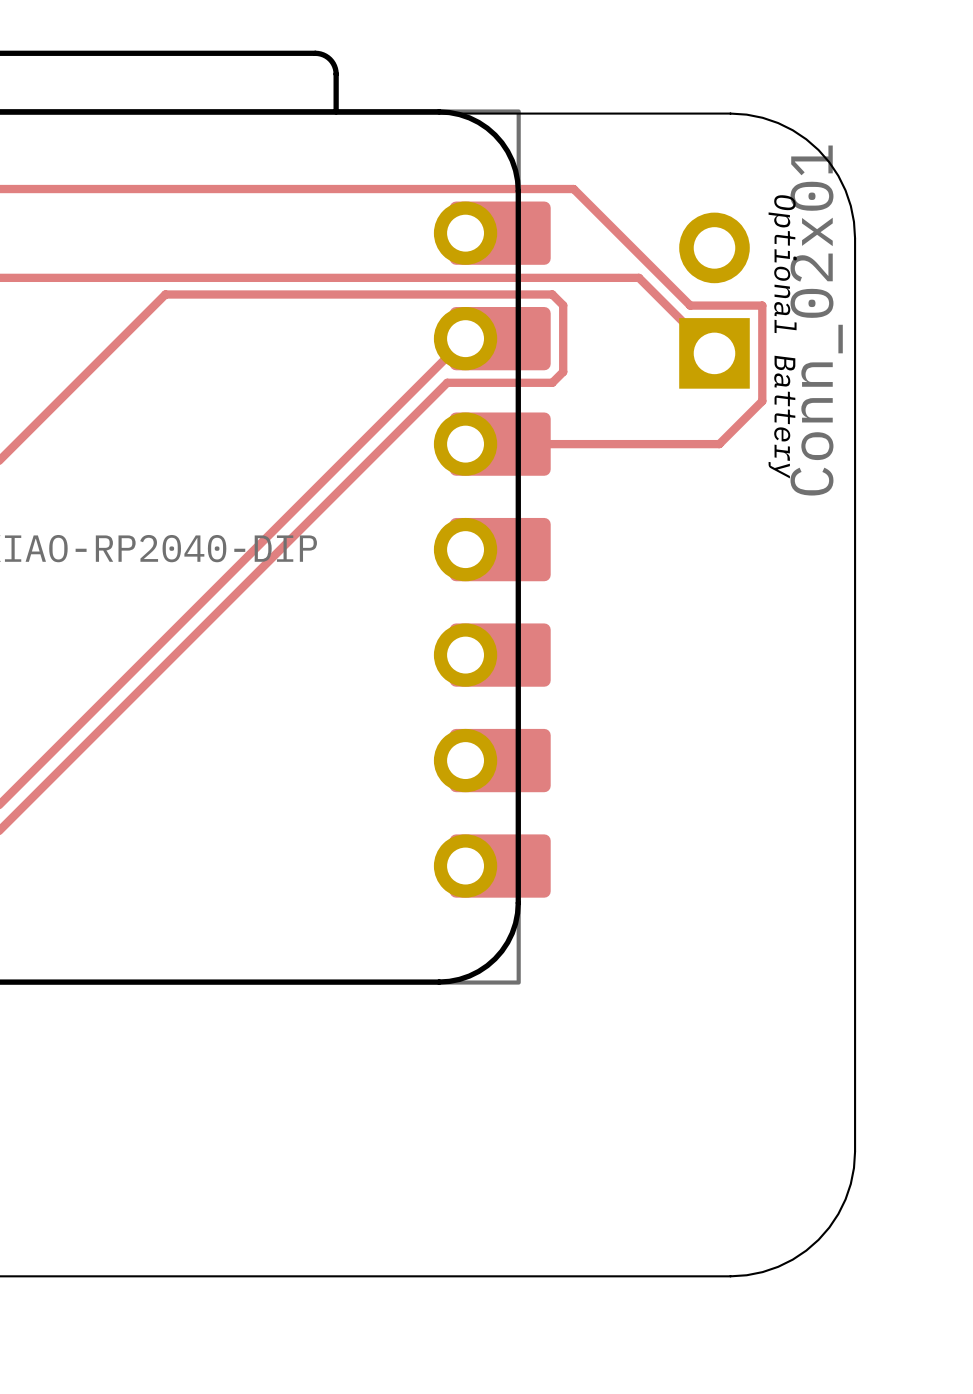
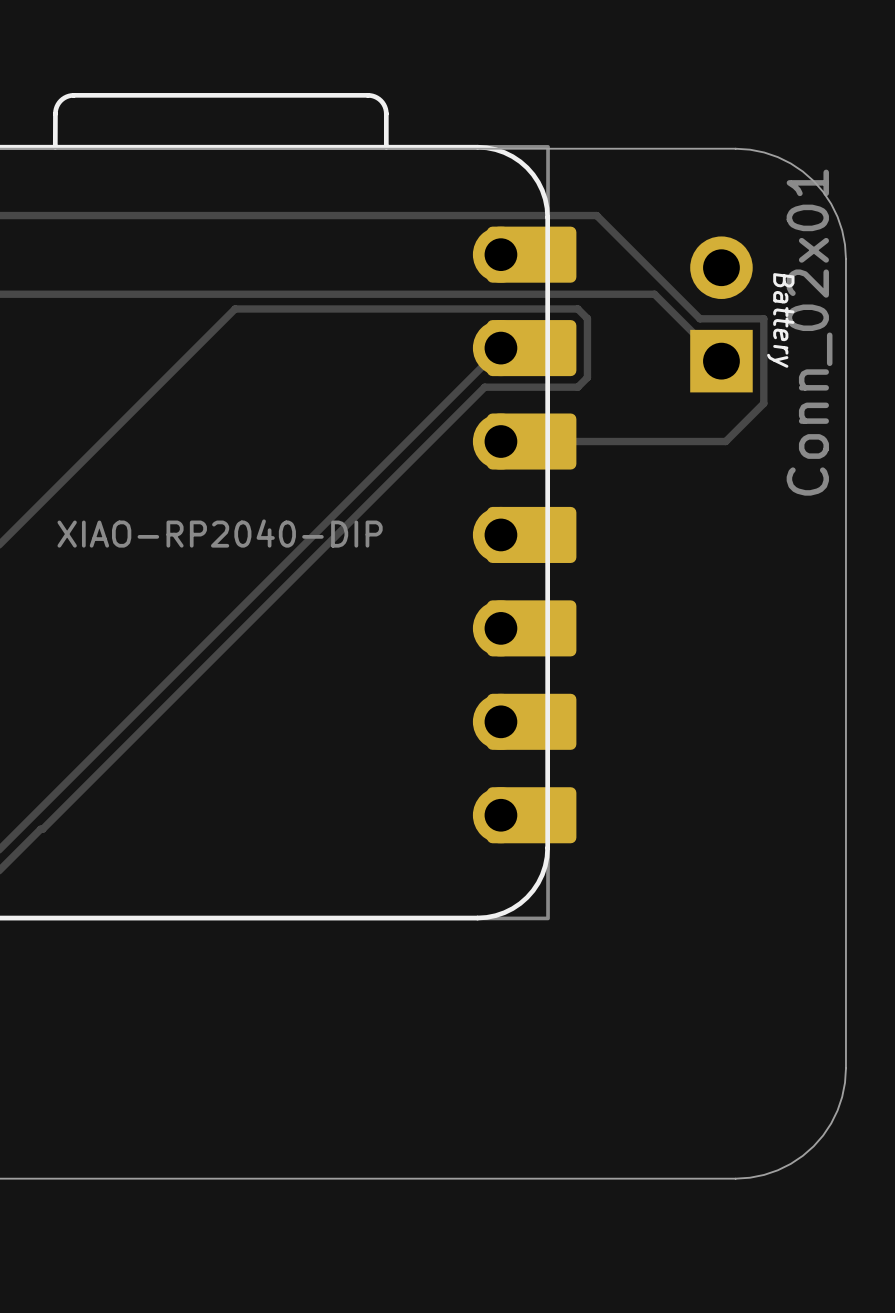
text: Optional Battery (782, 336) -> Battery (780, 320)

